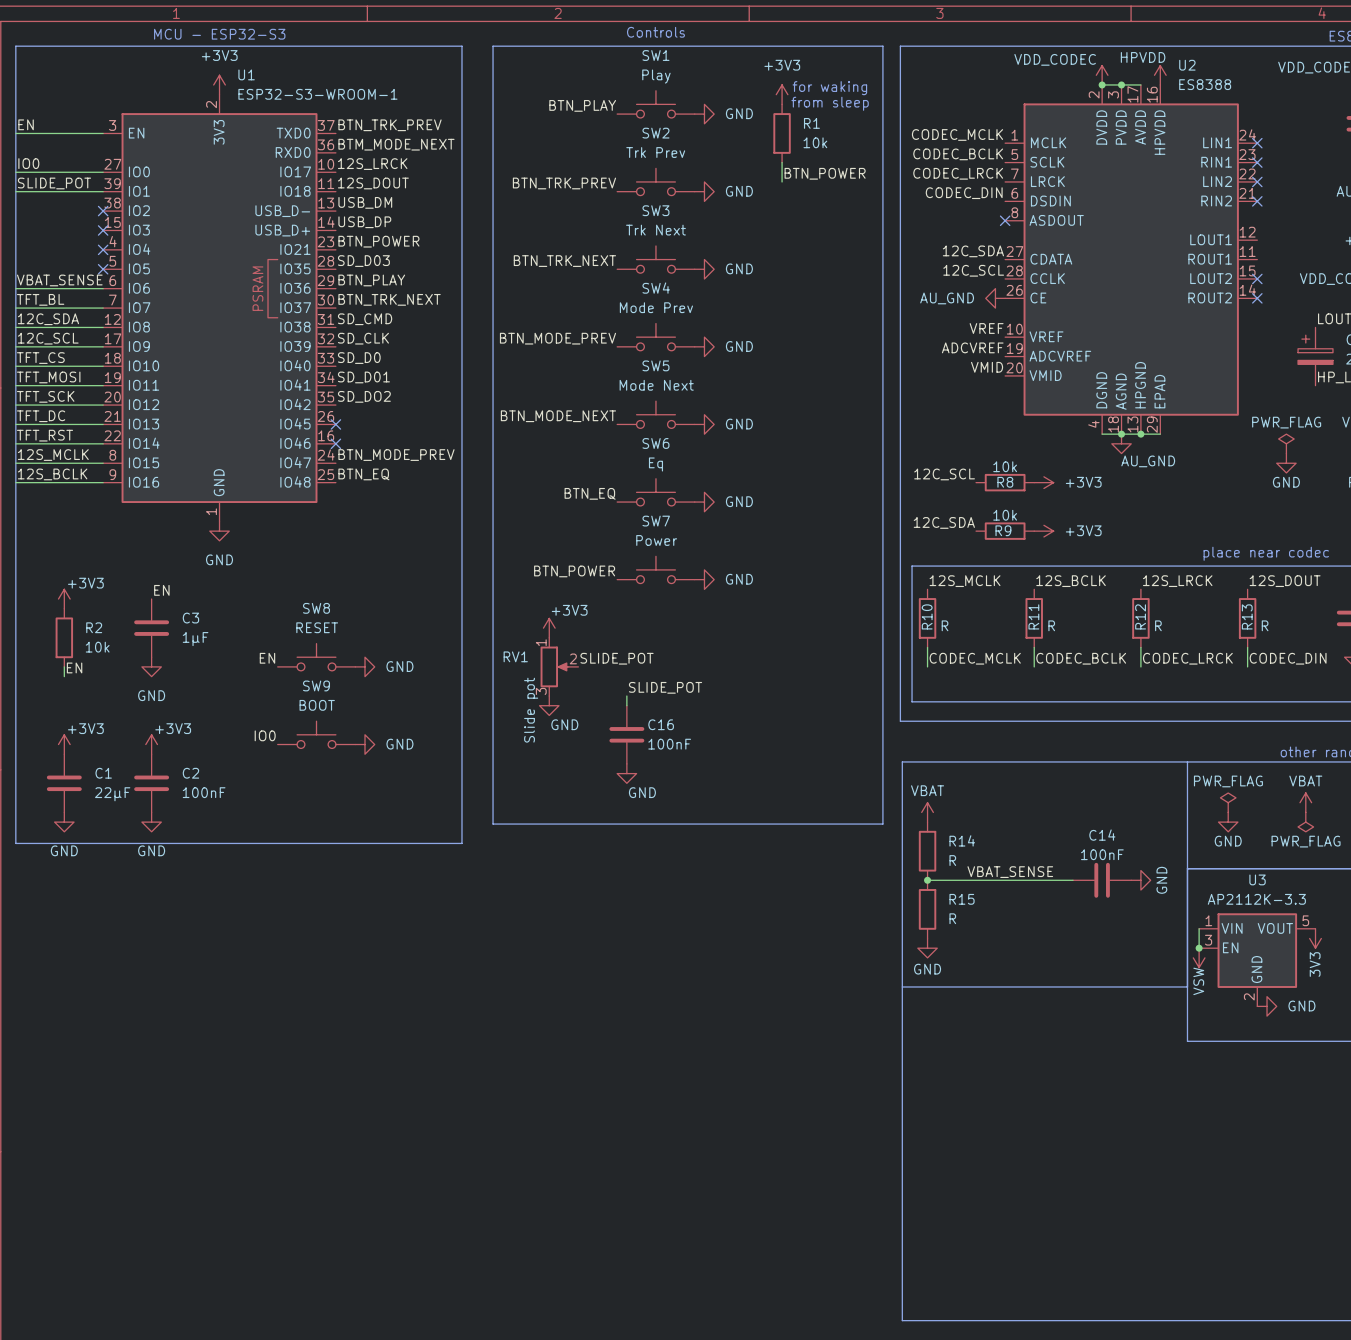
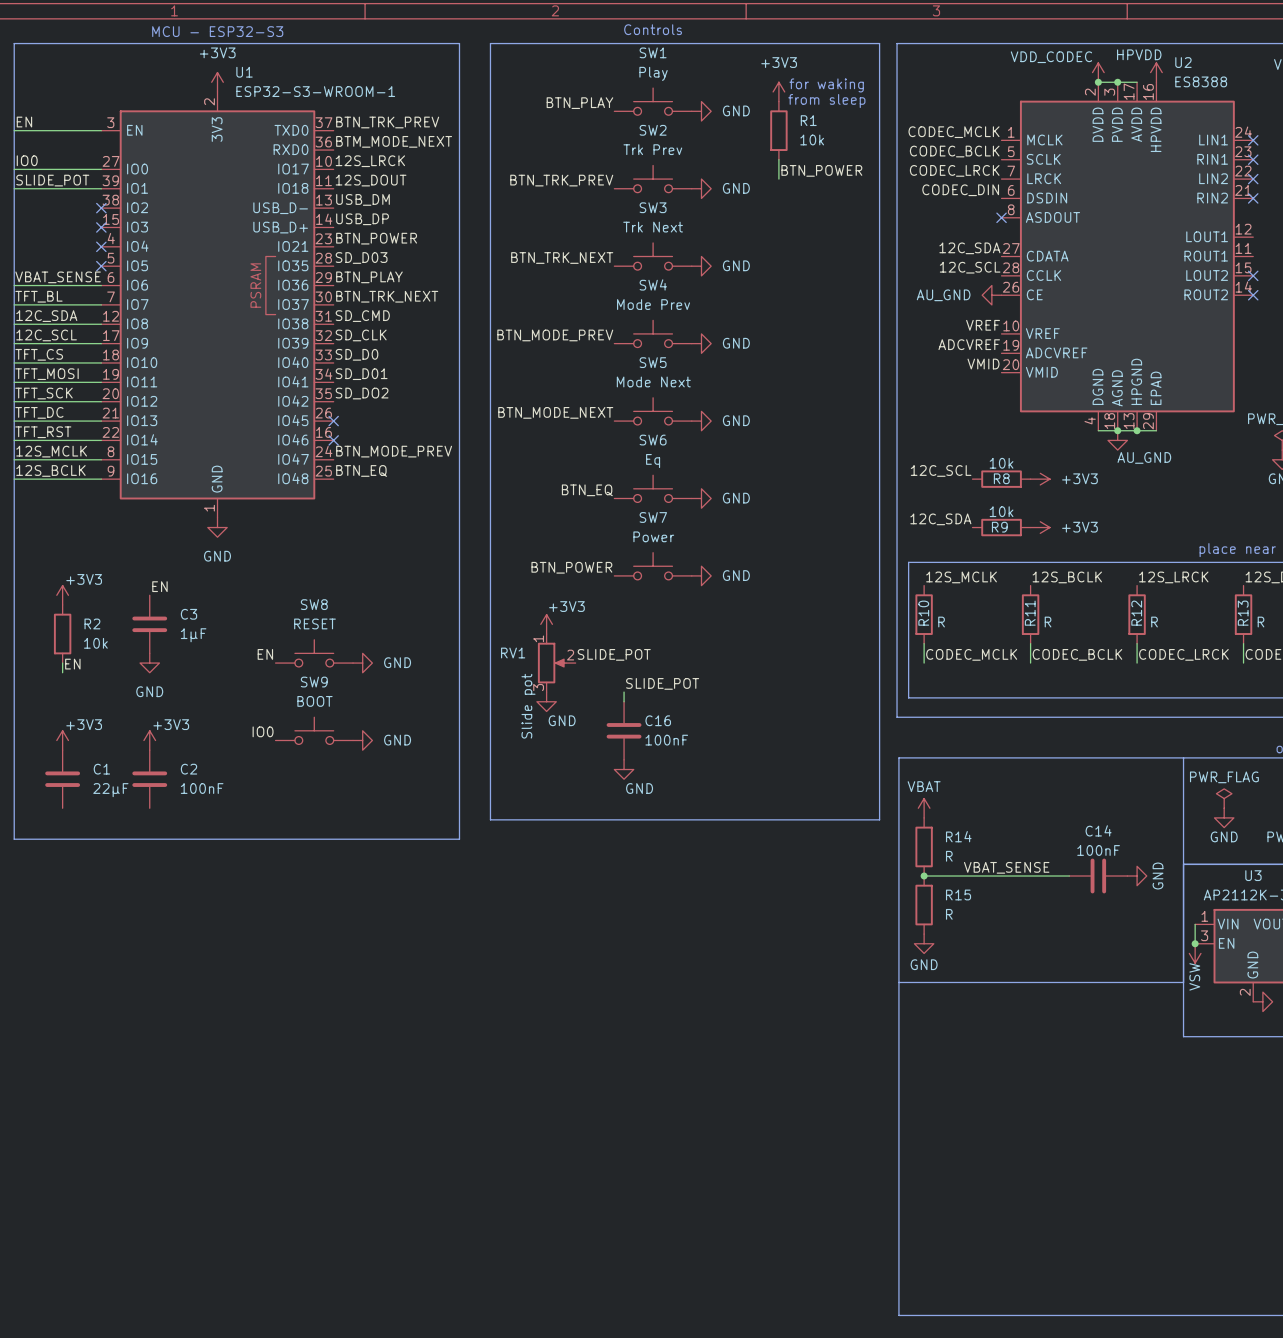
power symbol: GND (64, 822) -> none
power symbol: GND (151, 822) -> none

